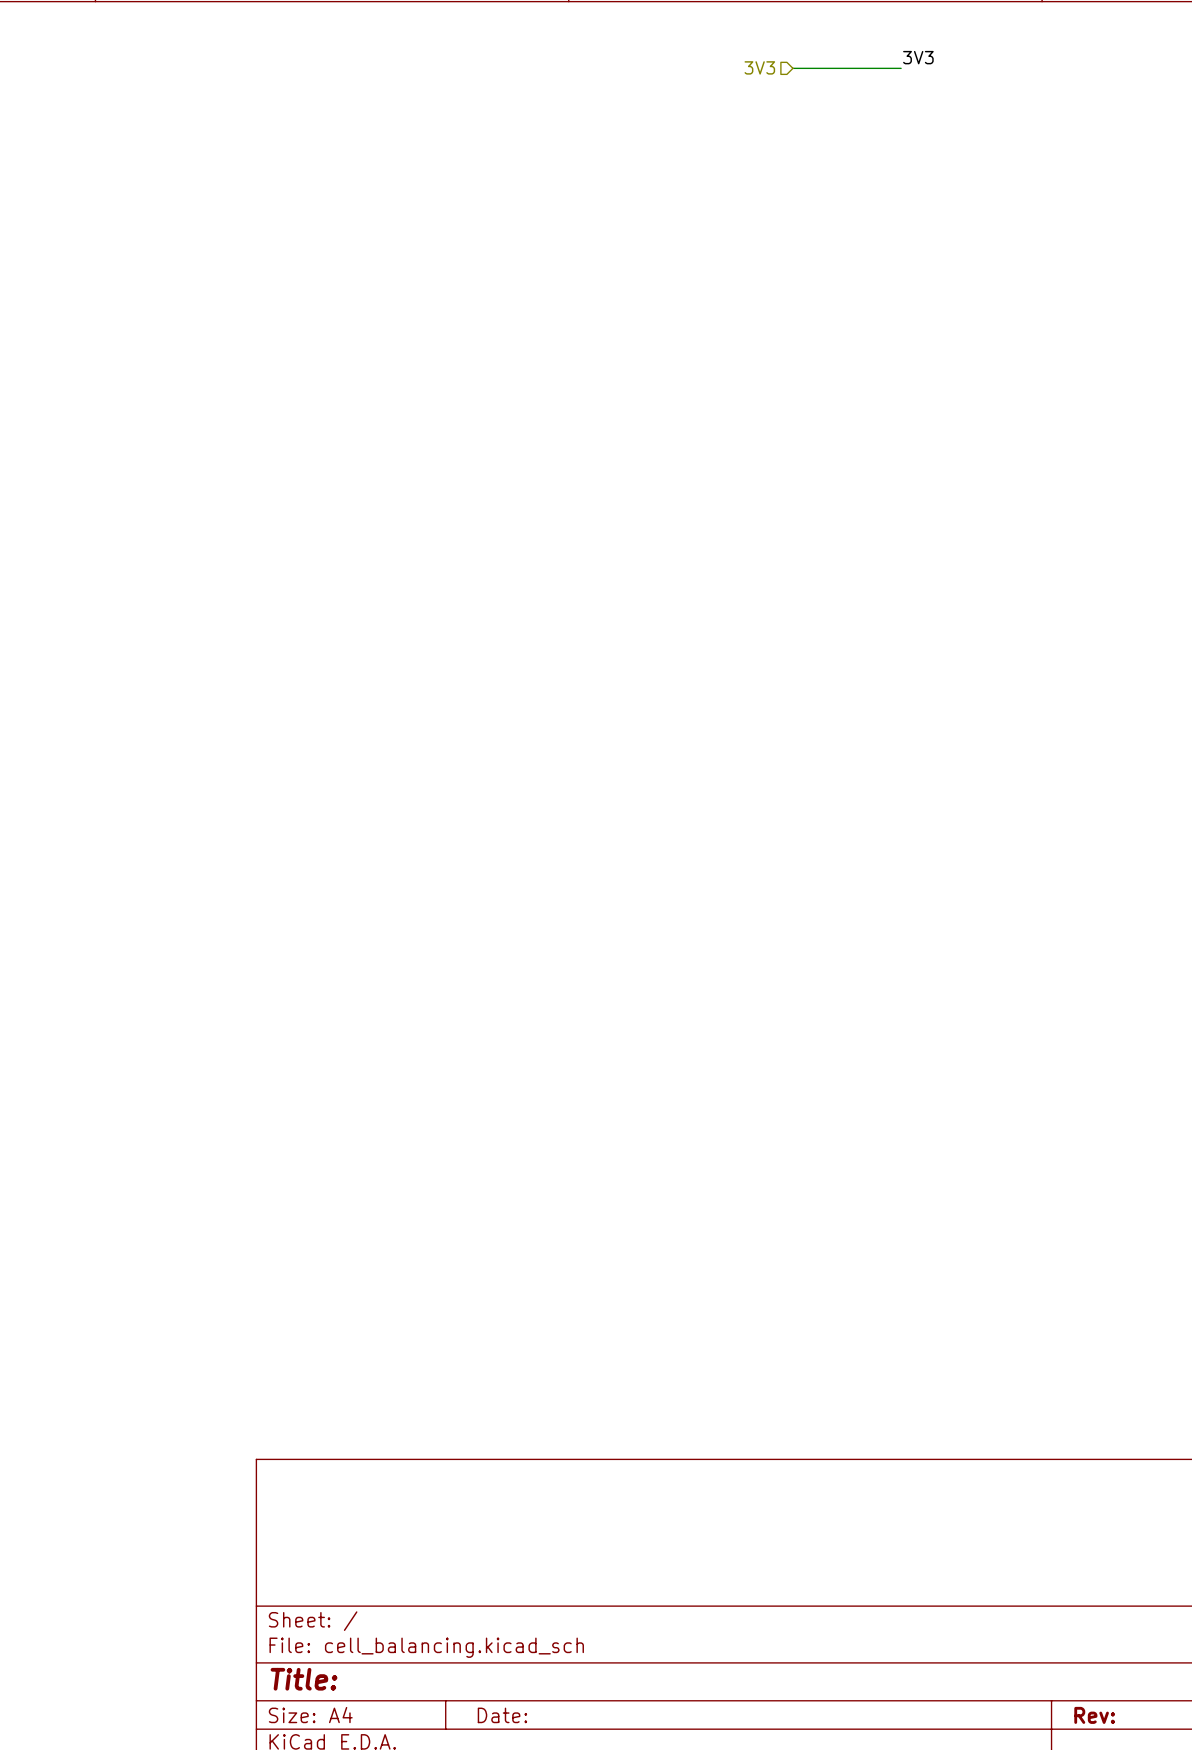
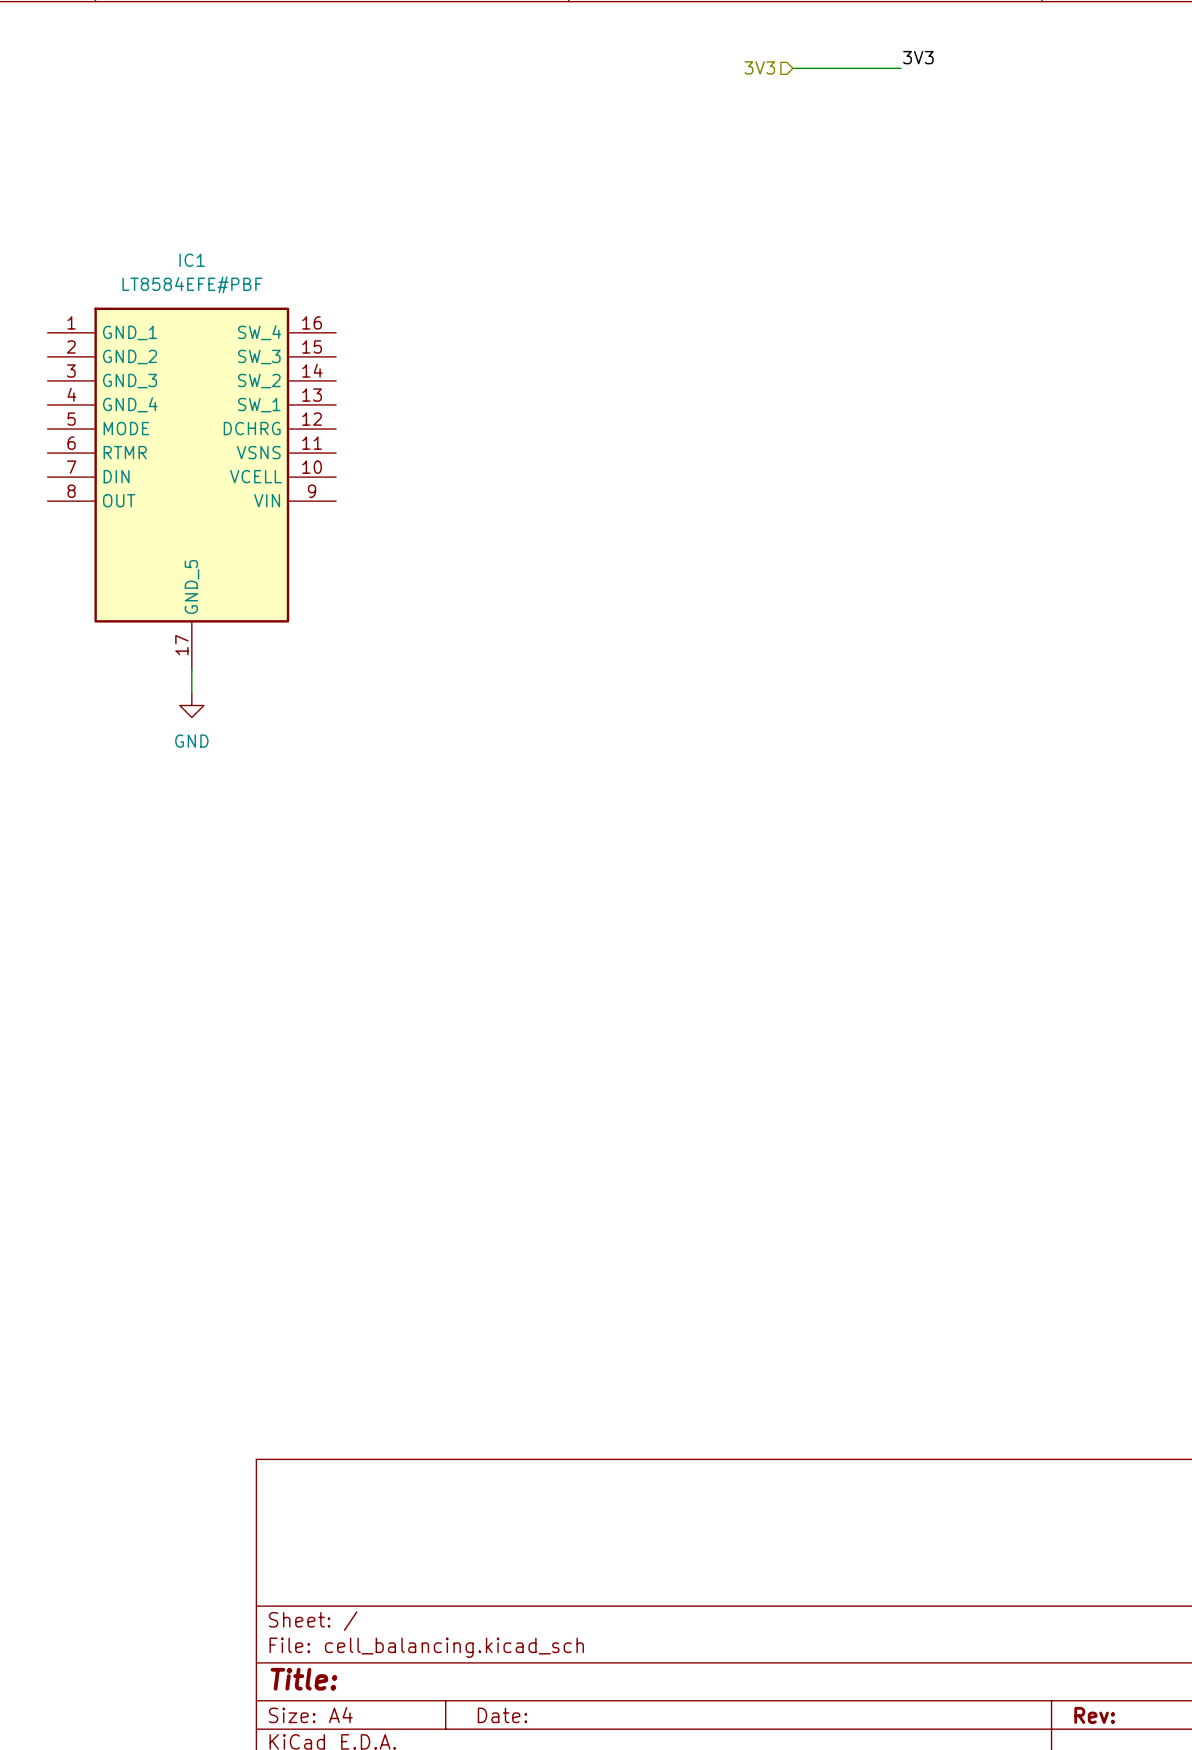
IC1: none -> LT8584EFE#PBF (191, 488)
wire: none -> (191, 669) (191, 693)
power symbol: none -> GND (191, 705)

